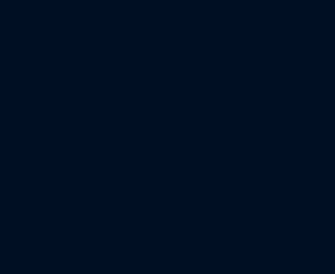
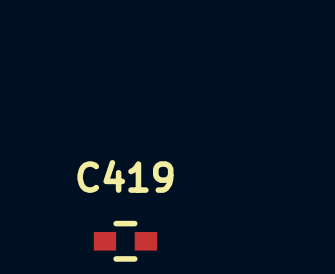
C419: none -> (125, 241)

